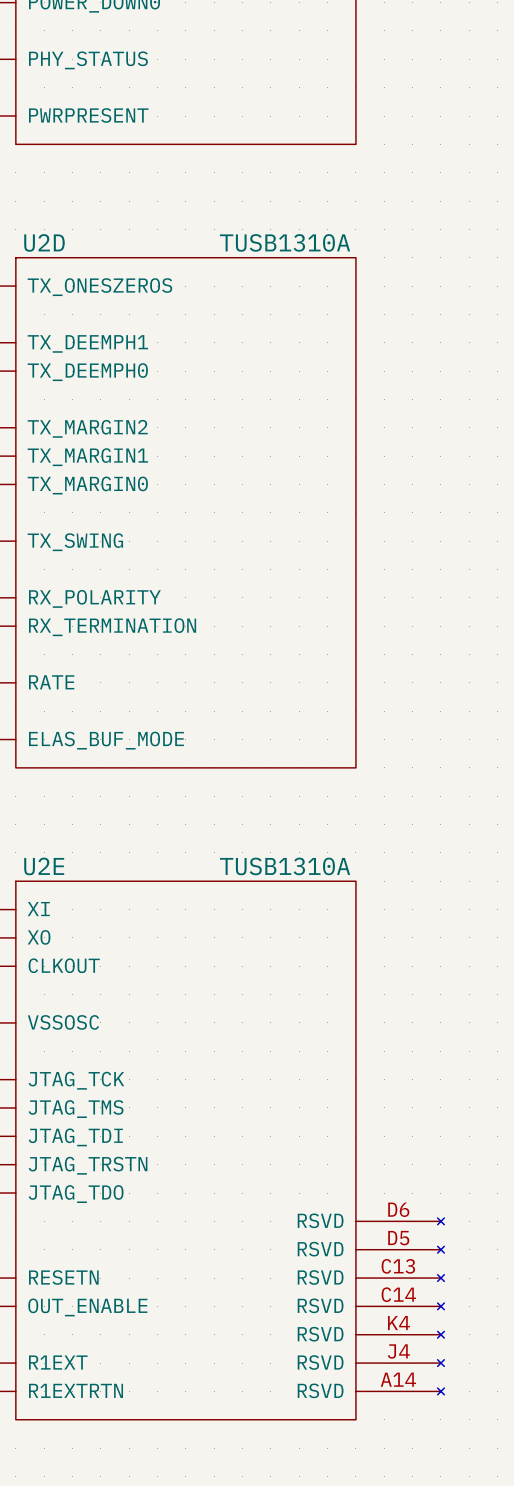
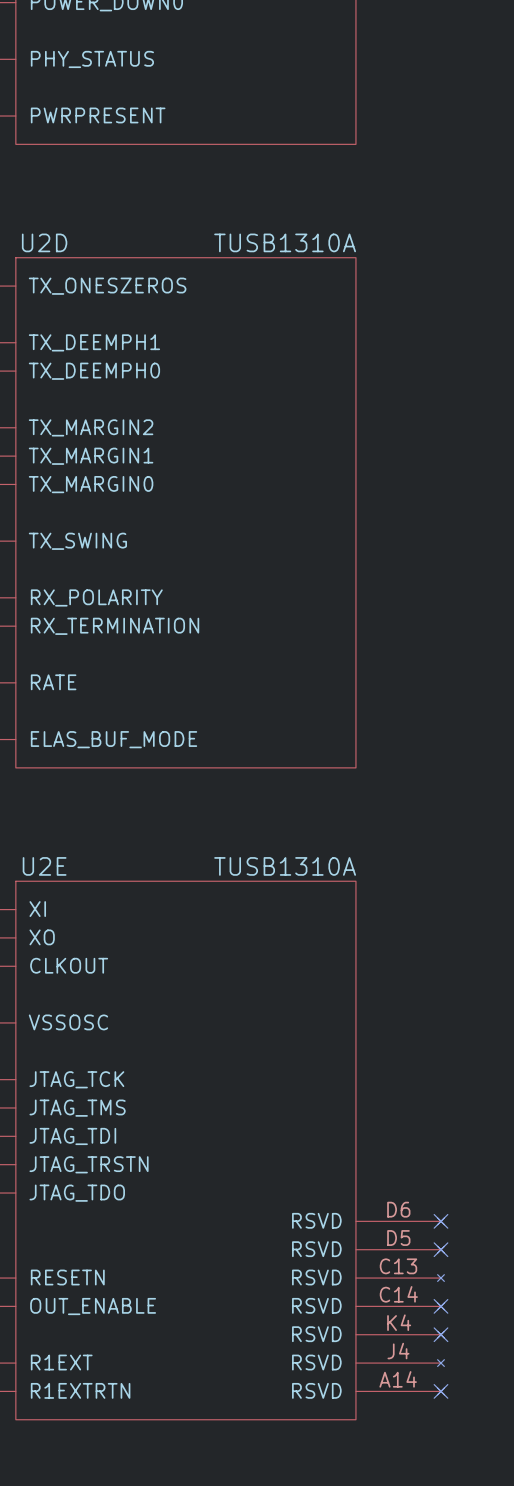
no-connect mark: none -> (440, 1221)
no-connect mark: none -> (440, 1249)
no-connect mark: none -> (440, 1306)
no-connect mark: none -> (440, 1334)
no-connect mark: none -> (440, 1391)

